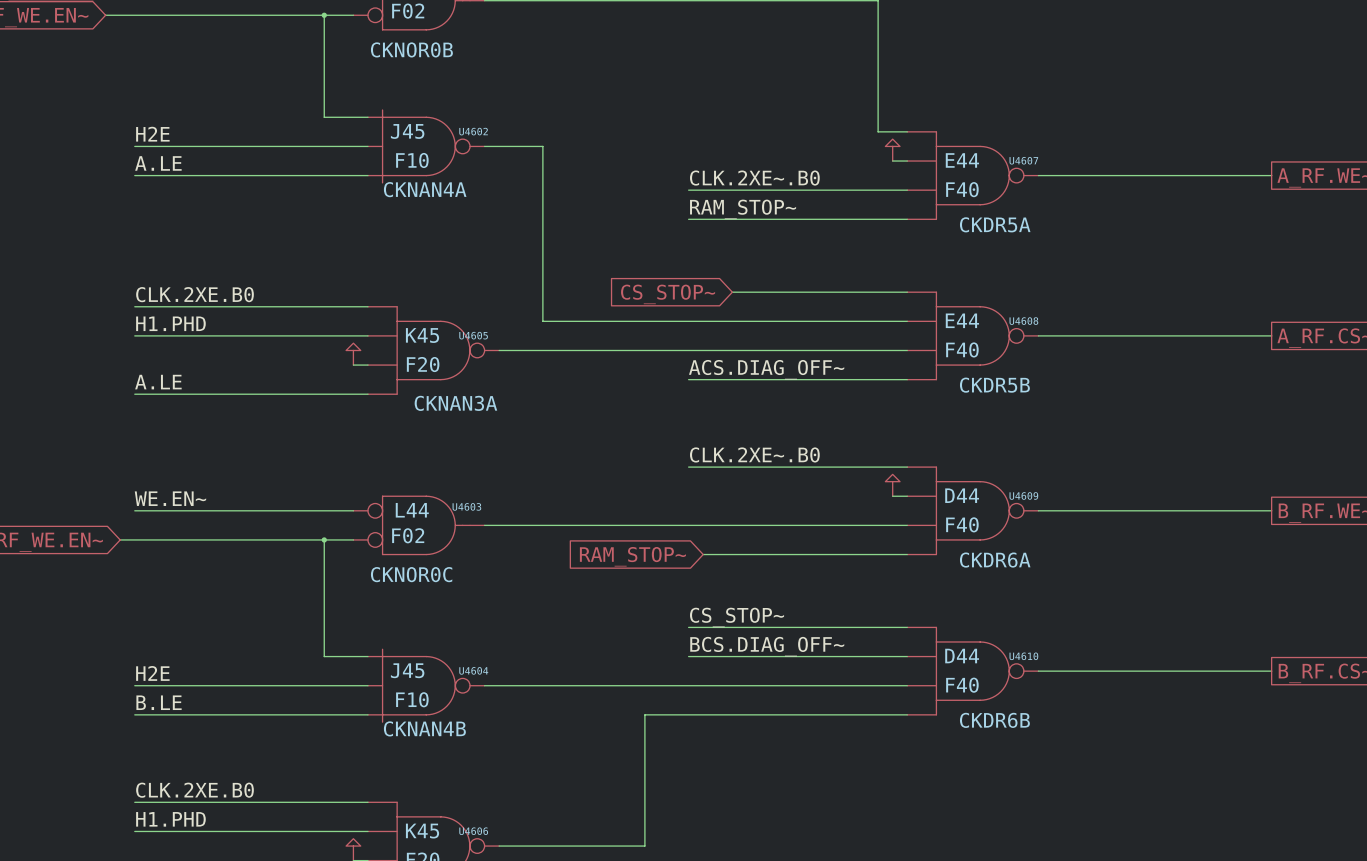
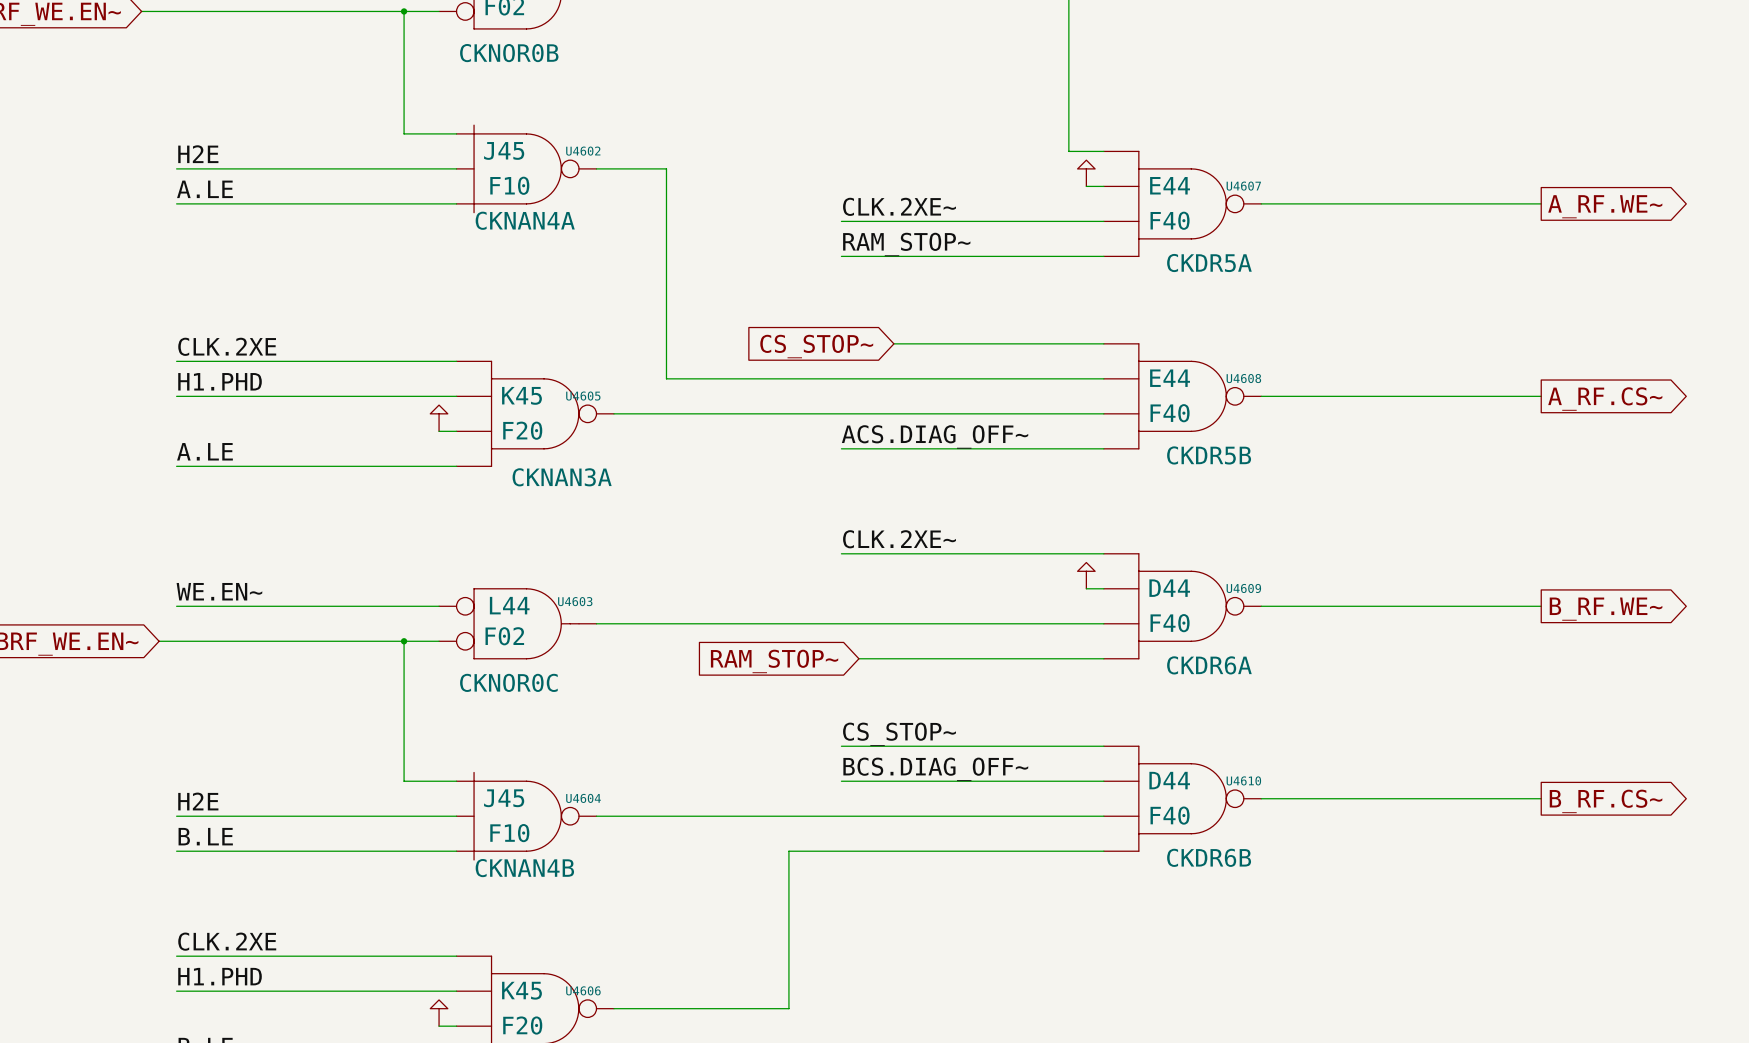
label: CLK.2XE~.B0 (754, 178) -> CLK.2XE~ (899, 206)
label: CLK.2XE.B0 (195, 294) -> CLK.2XE (227, 346)
label: CLK.2XE~.B0 (754, 454) -> CLK.2XE~ (899, 539)
label: CLK.2XE.B0 (195, 790) -> CLK.2XE (227, 941)

